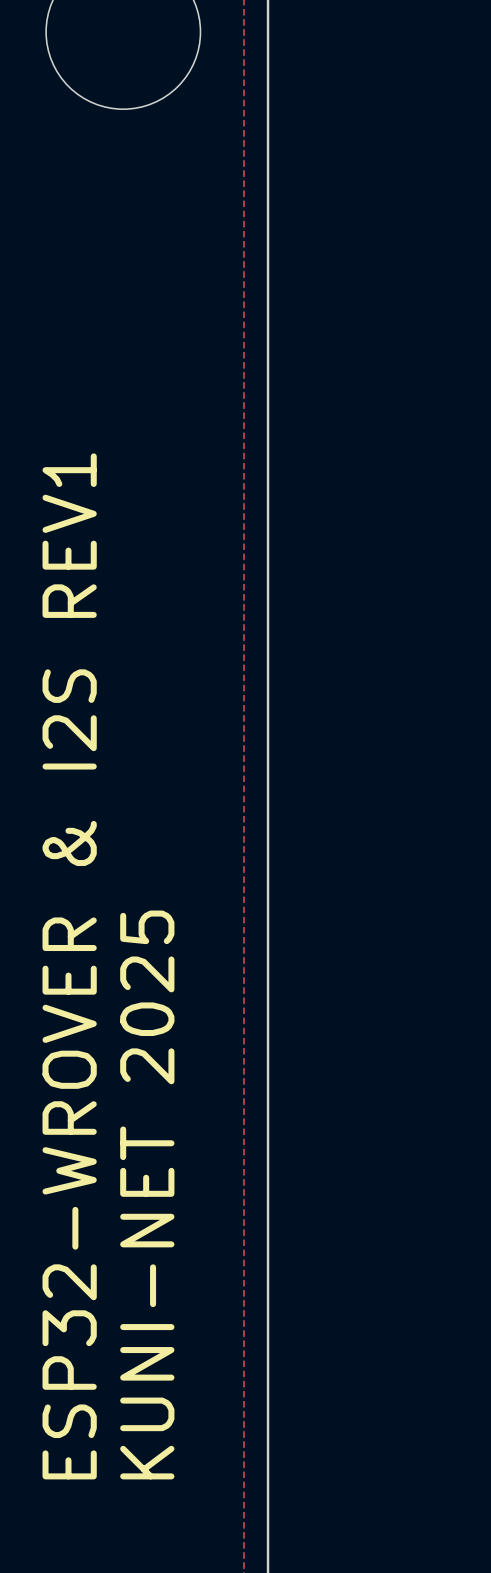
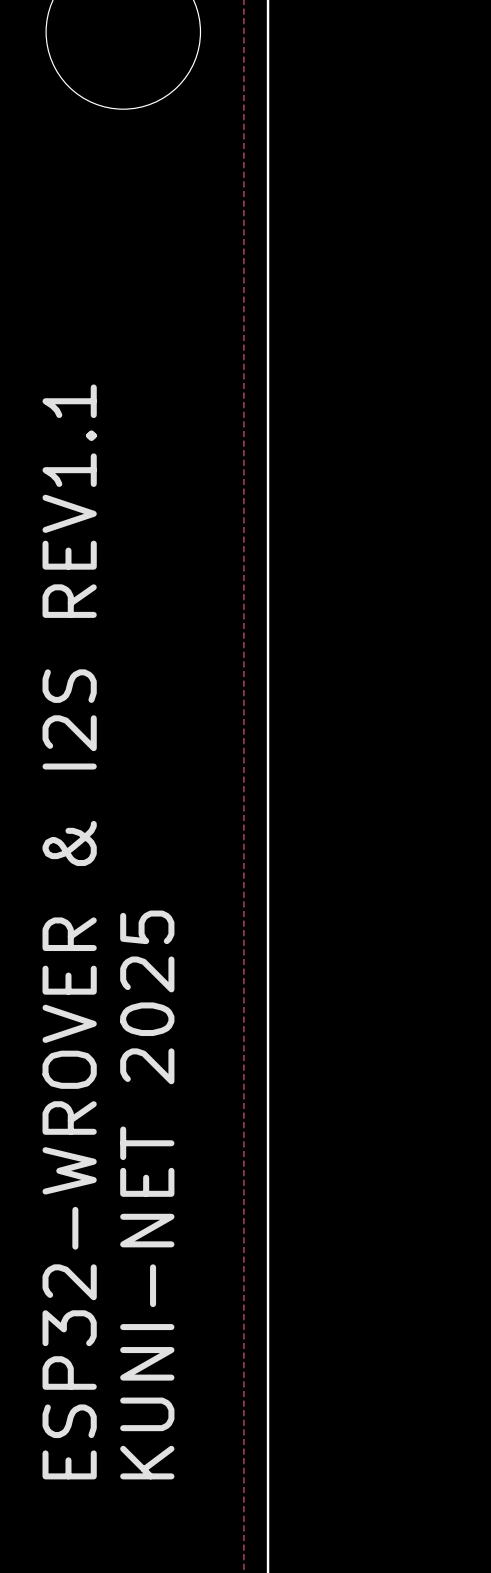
text: ESP32-WROVER & I2S REV1 (69, 966) -> ESP32-WROVER & I2S REV1.1 (69, 931)

